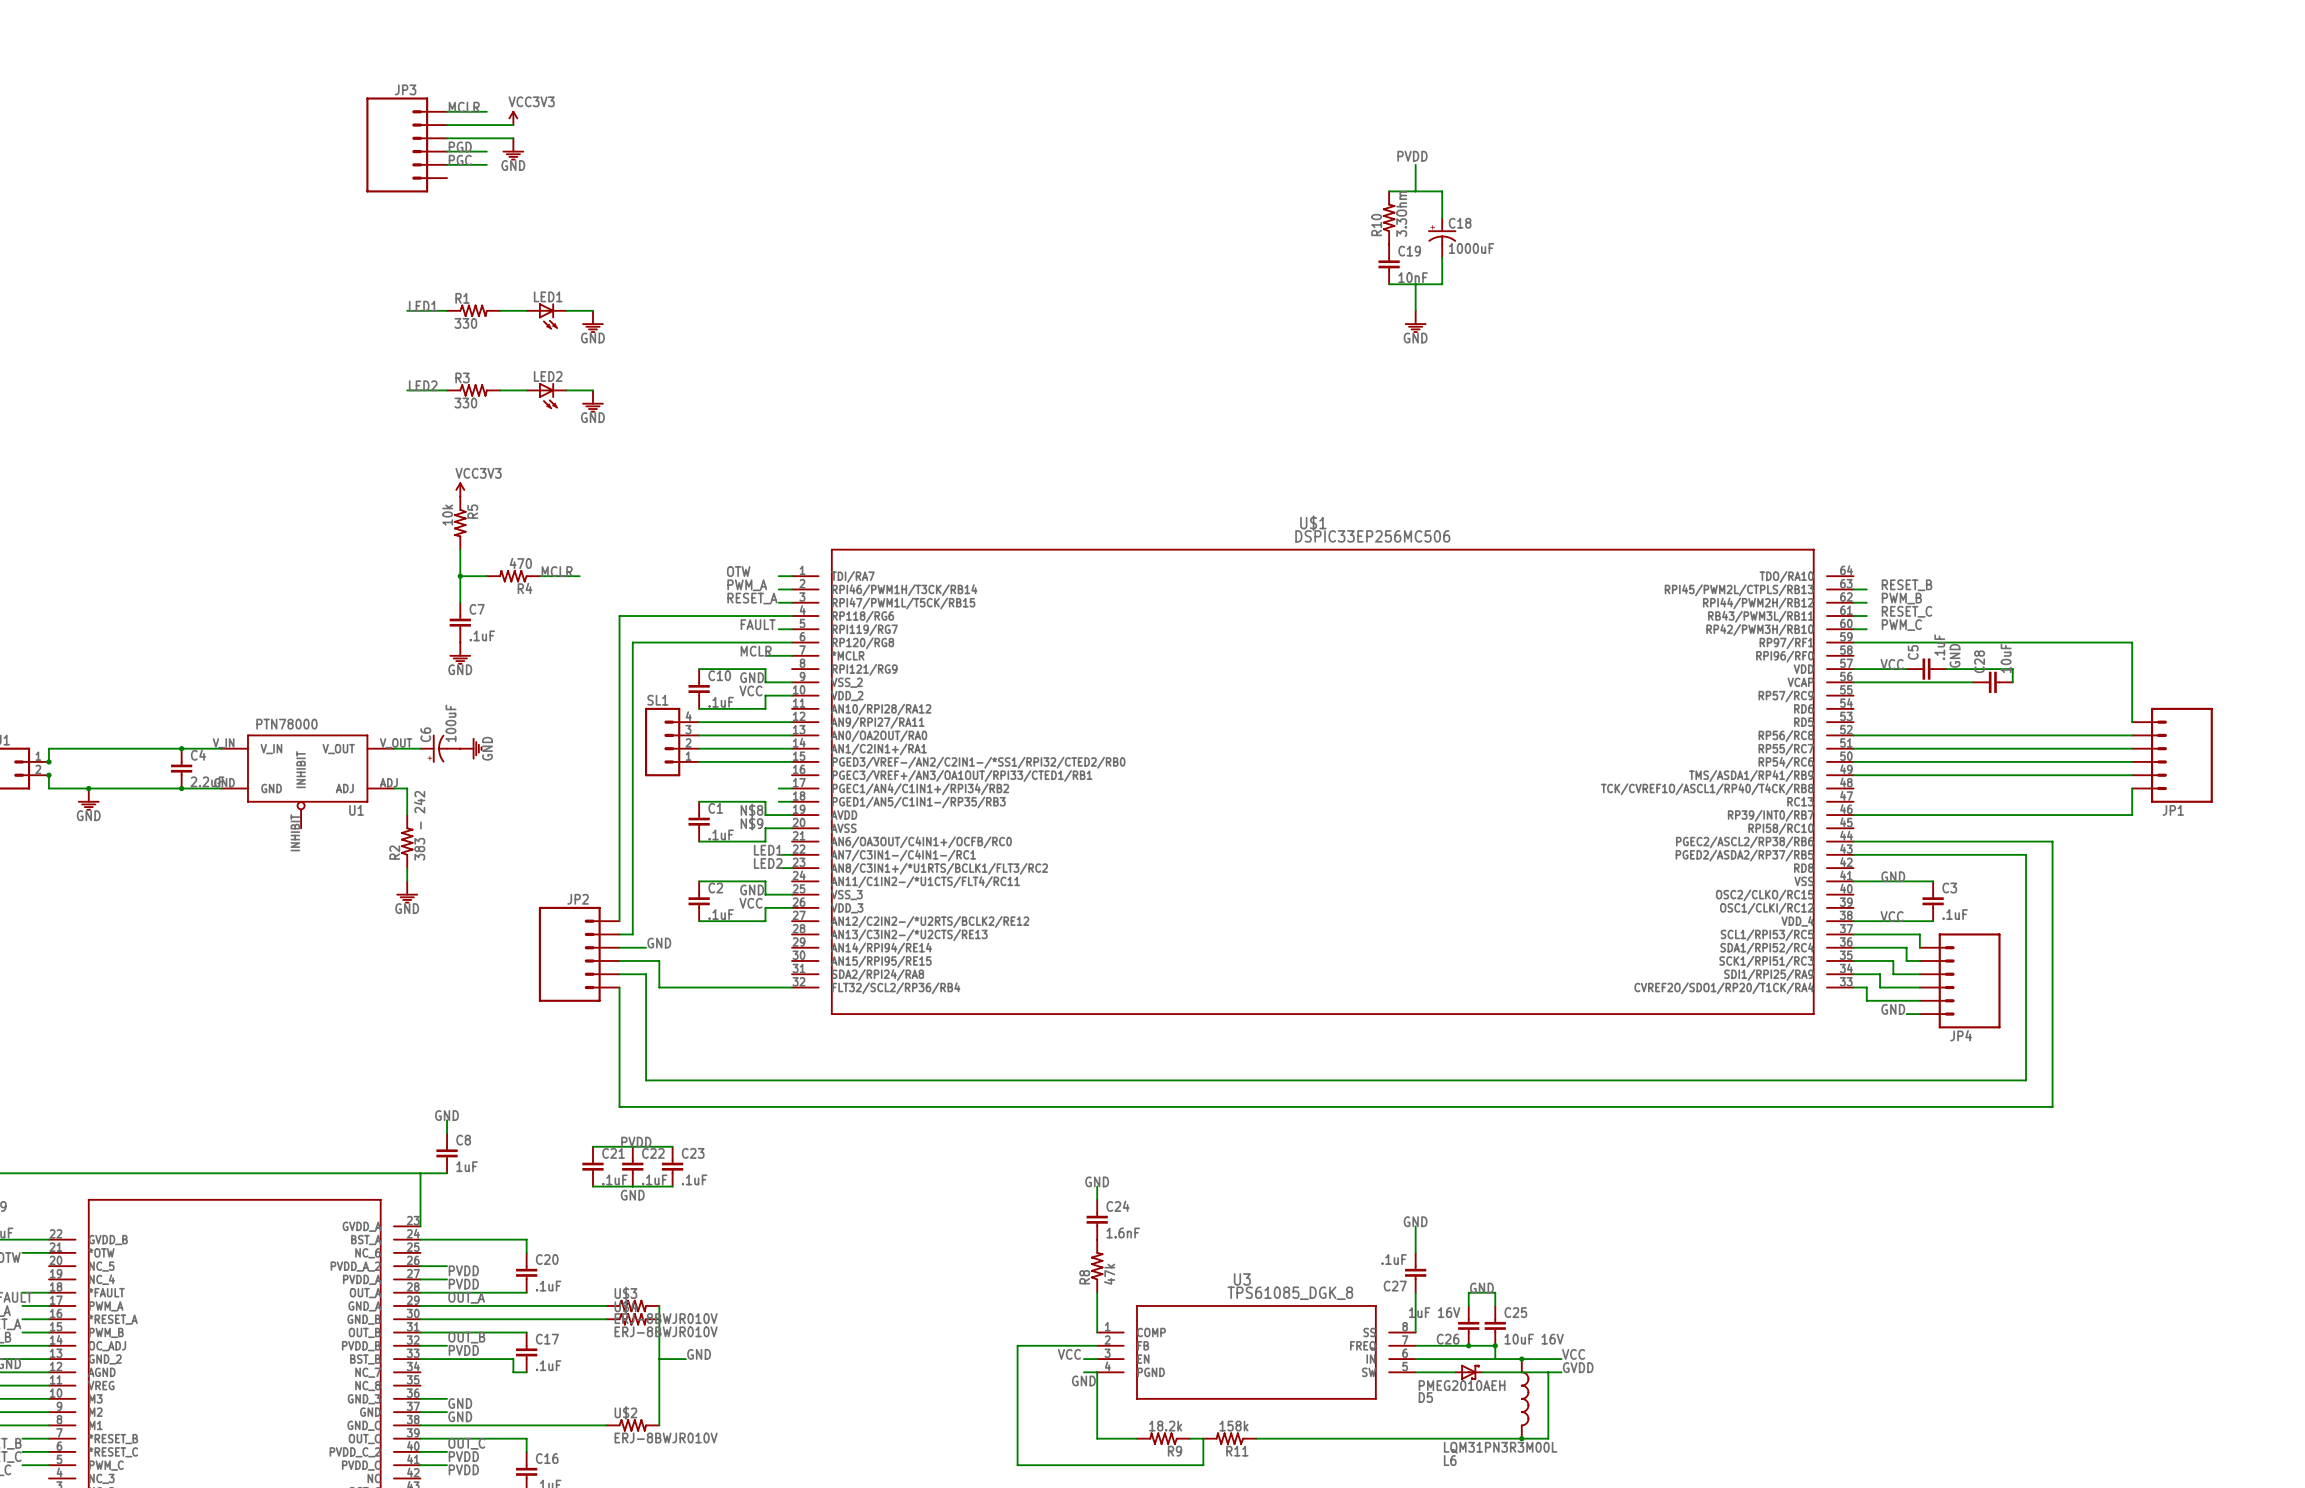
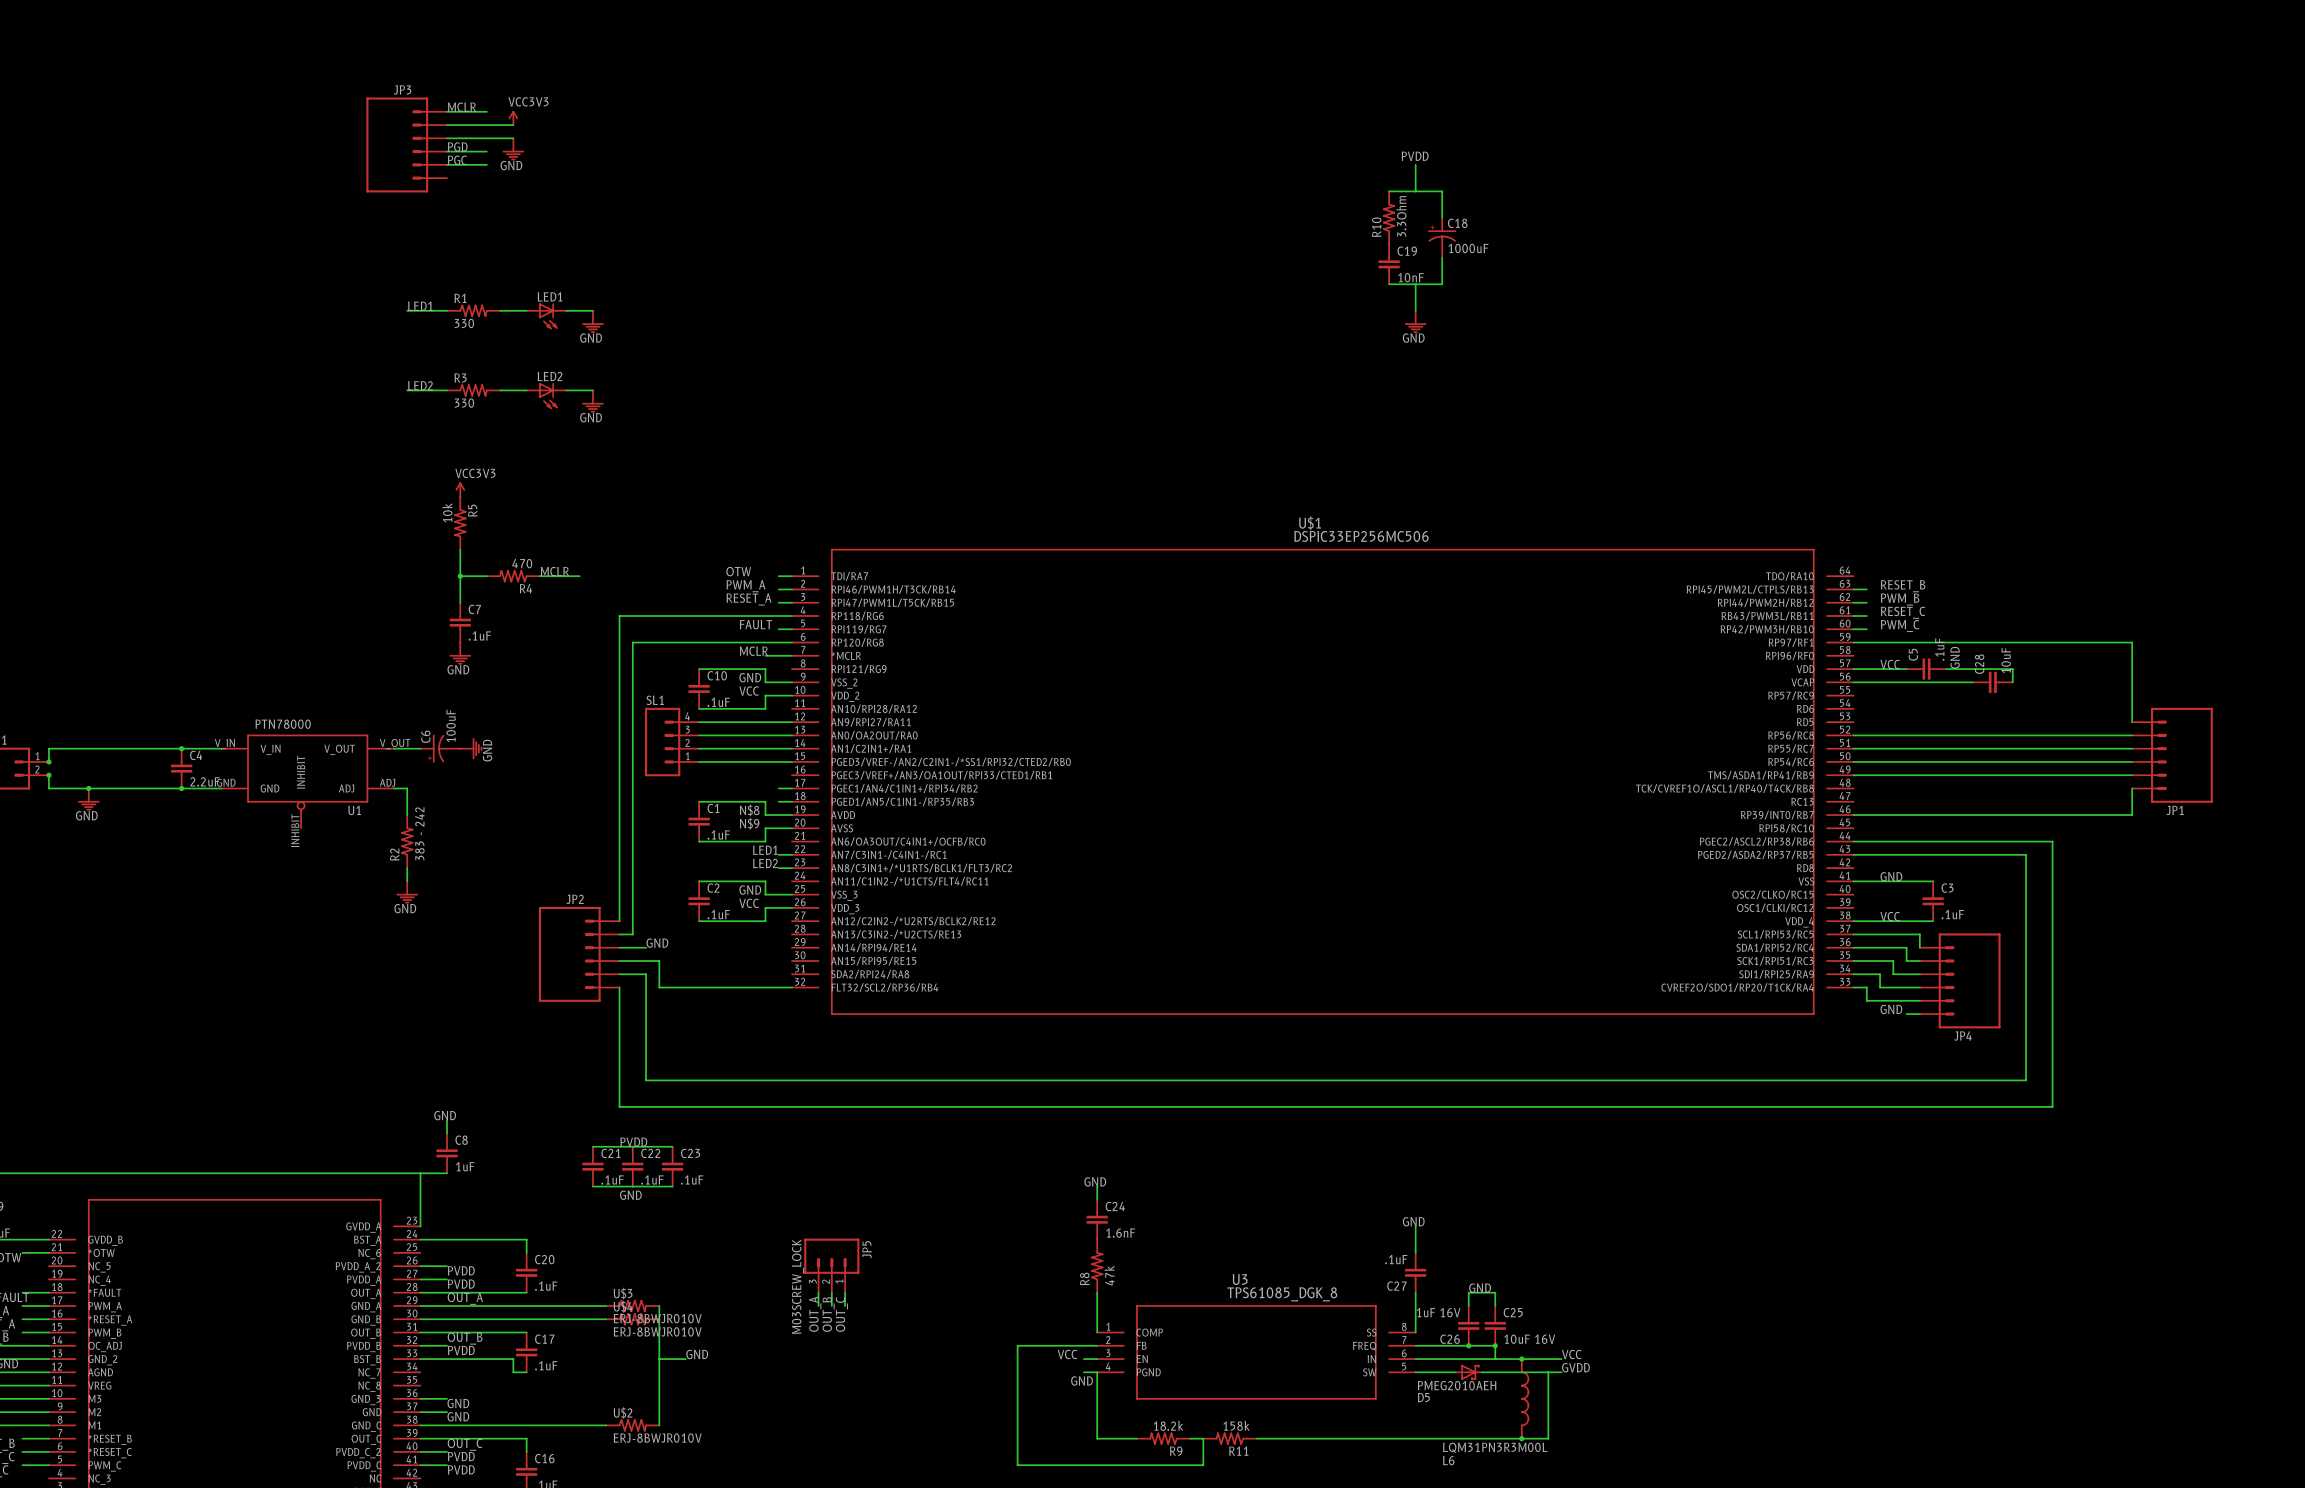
JP5: none -> M03SCREW_LOCK (831, 1265)
wire: none -> (818, 1292) (818, 1305)
wire: none -> (831, 1292) (831, 1305)
wire: none -> (845, 1292) (845, 1305)
label: none -> OUT_A (815, 1314)
label: none -> OUT_B (828, 1314)
label: none -> OUT_C (841, 1314)

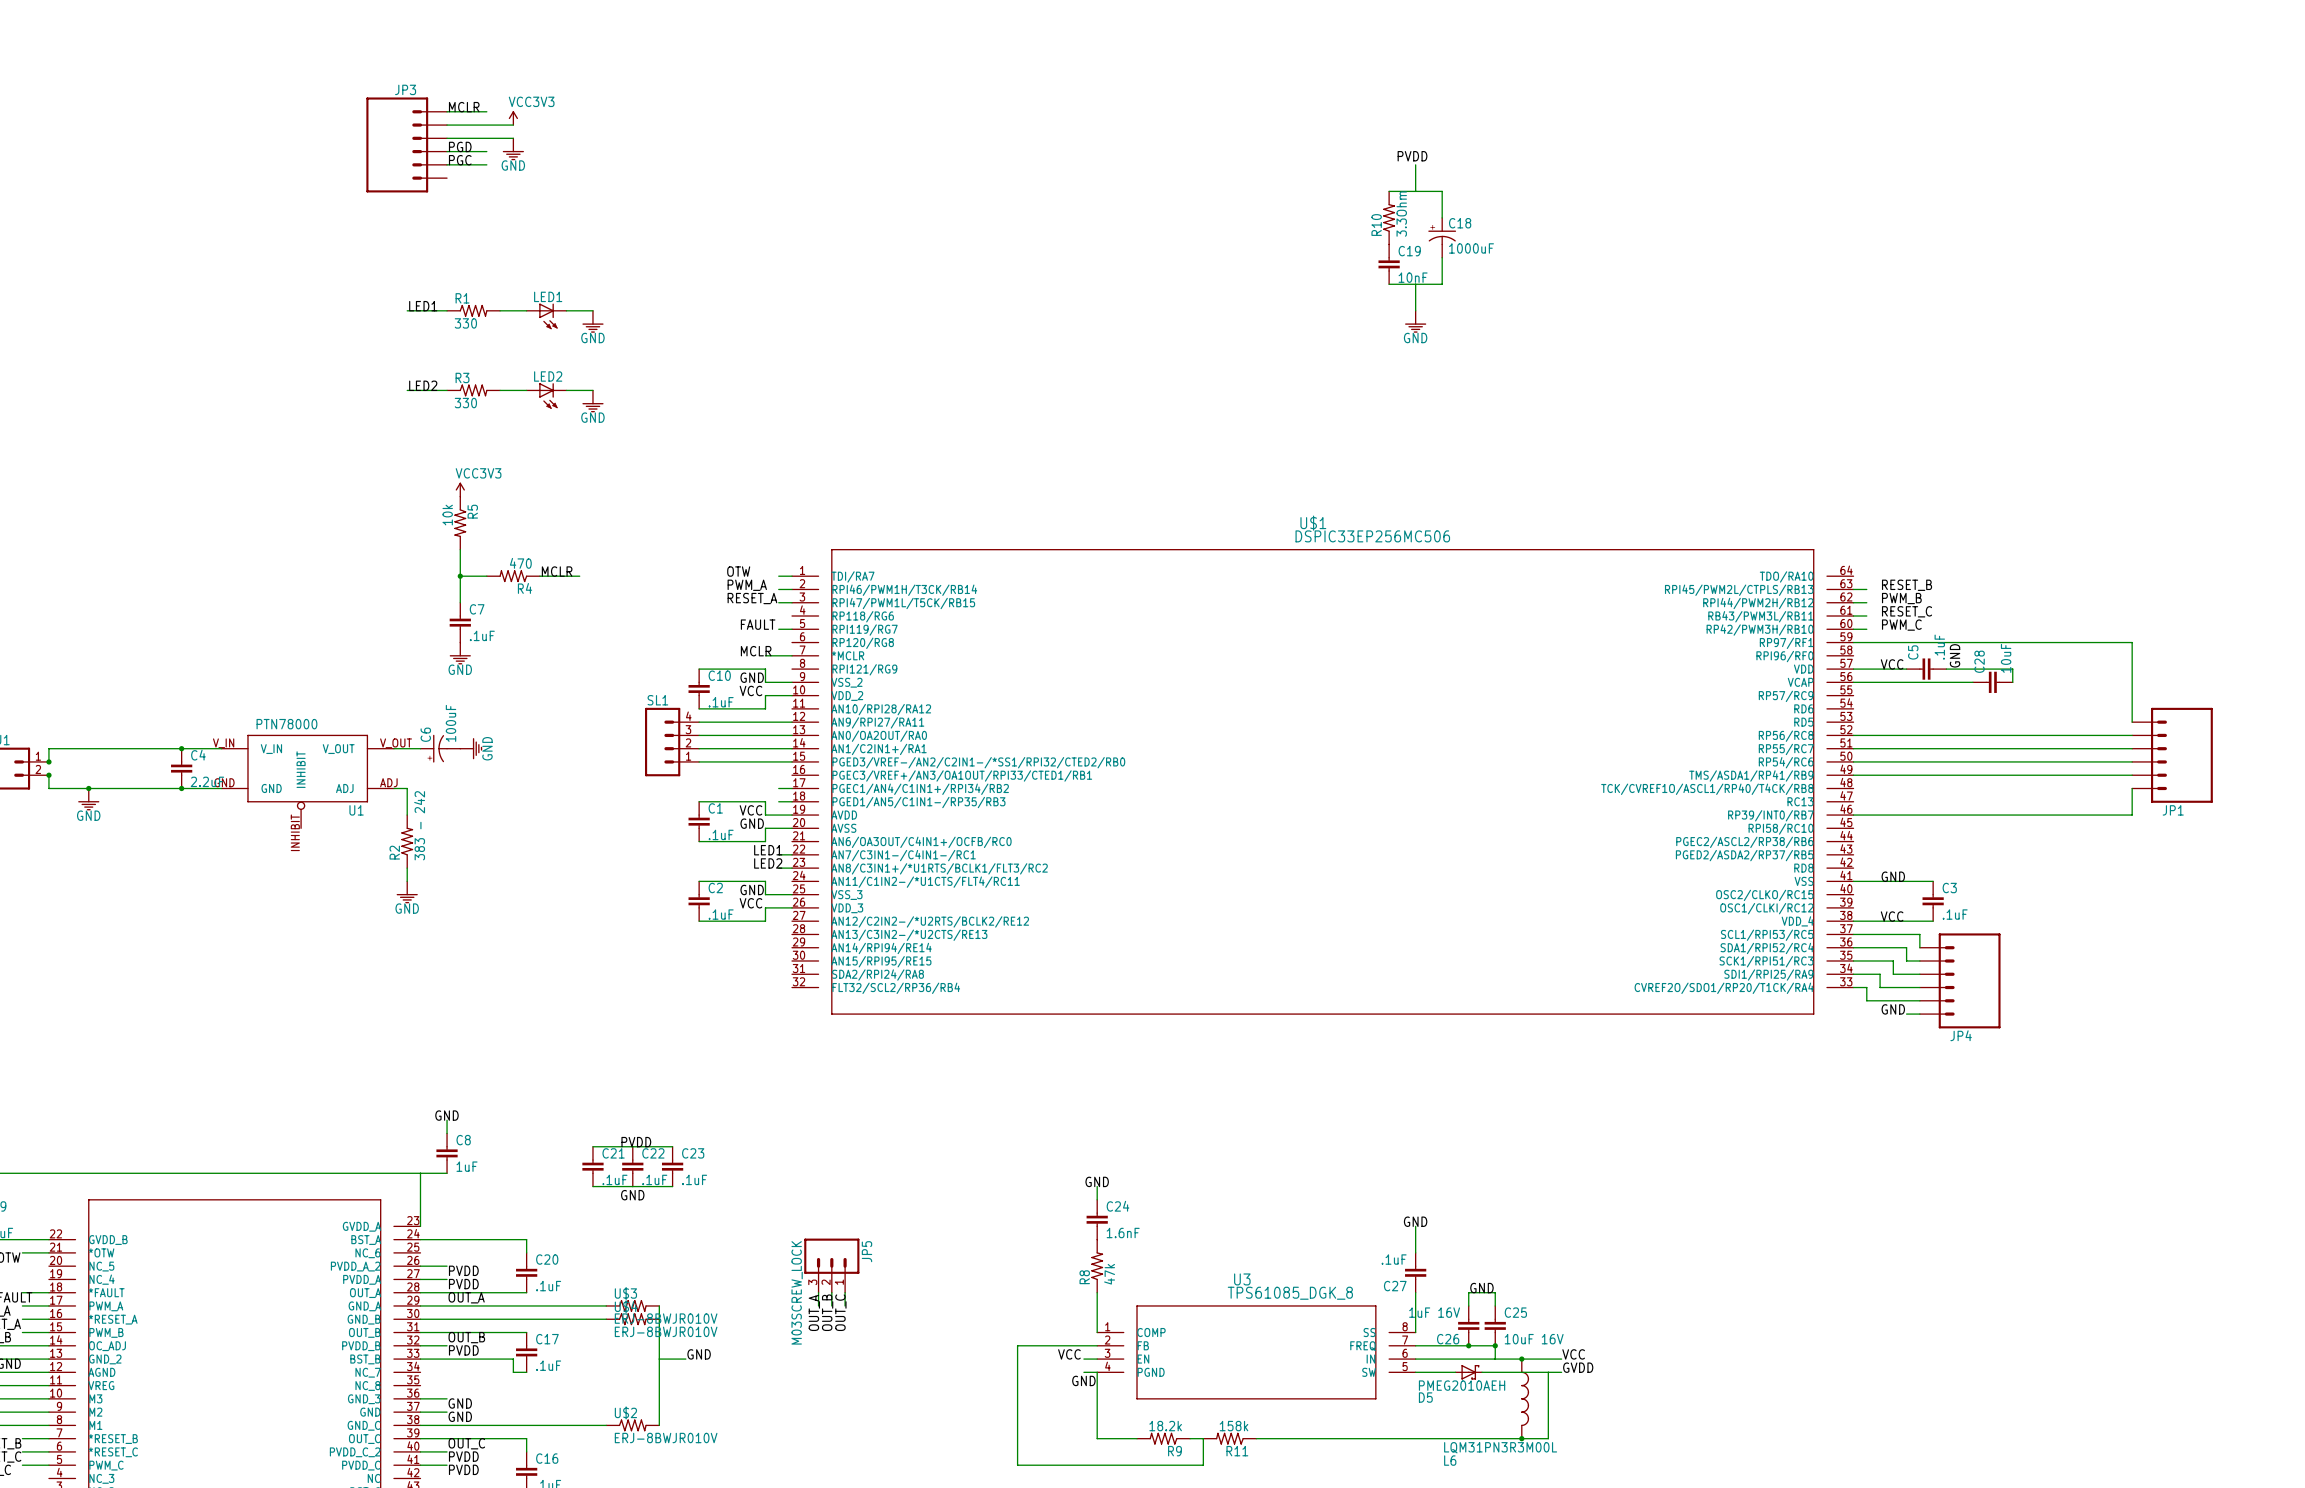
wire: (792, 616) (619, 616) (619, 921) -> none
wire: (792, 642) (632, 642) (632, 934) (619, 934) -> none
label: N$8 (749, 810) -> VCC (750, 810)
label: N$9 (749, 823) -> GND (752, 823)
wire: (1853, 841) (2052, 841) (2052, 1106) (619, 1106) (619, 987) -> none
wire: (1853, 854) (2026, 854) (2026, 1080) (646, 1080) (646, 974) (619, 974) -> none
label: GND (657, 943) -> none
wire: (619, 947) (646, 947) -> none
JP2: (579, 954) -> none
wire: (619, 960) (659, 960) (659, 987) (792, 987) -> none

